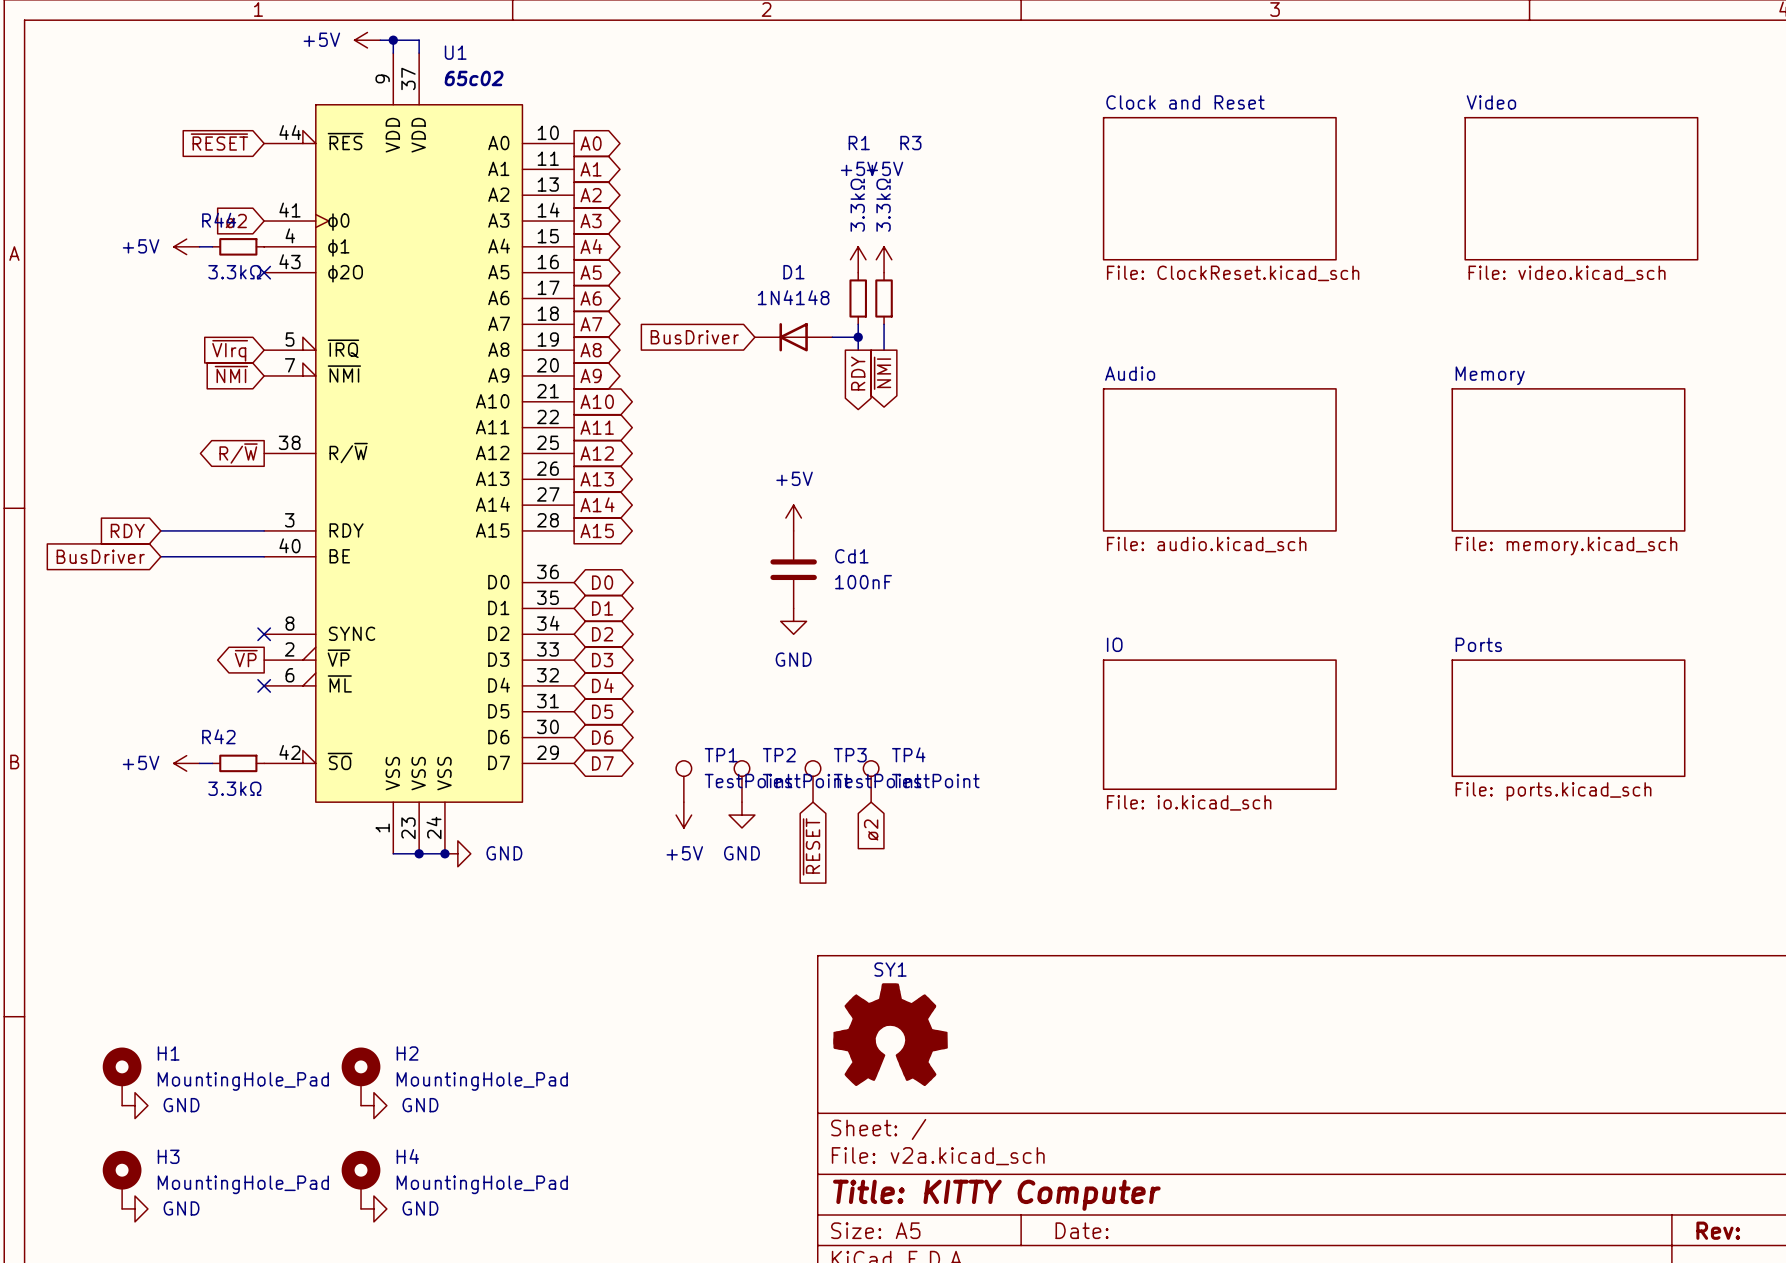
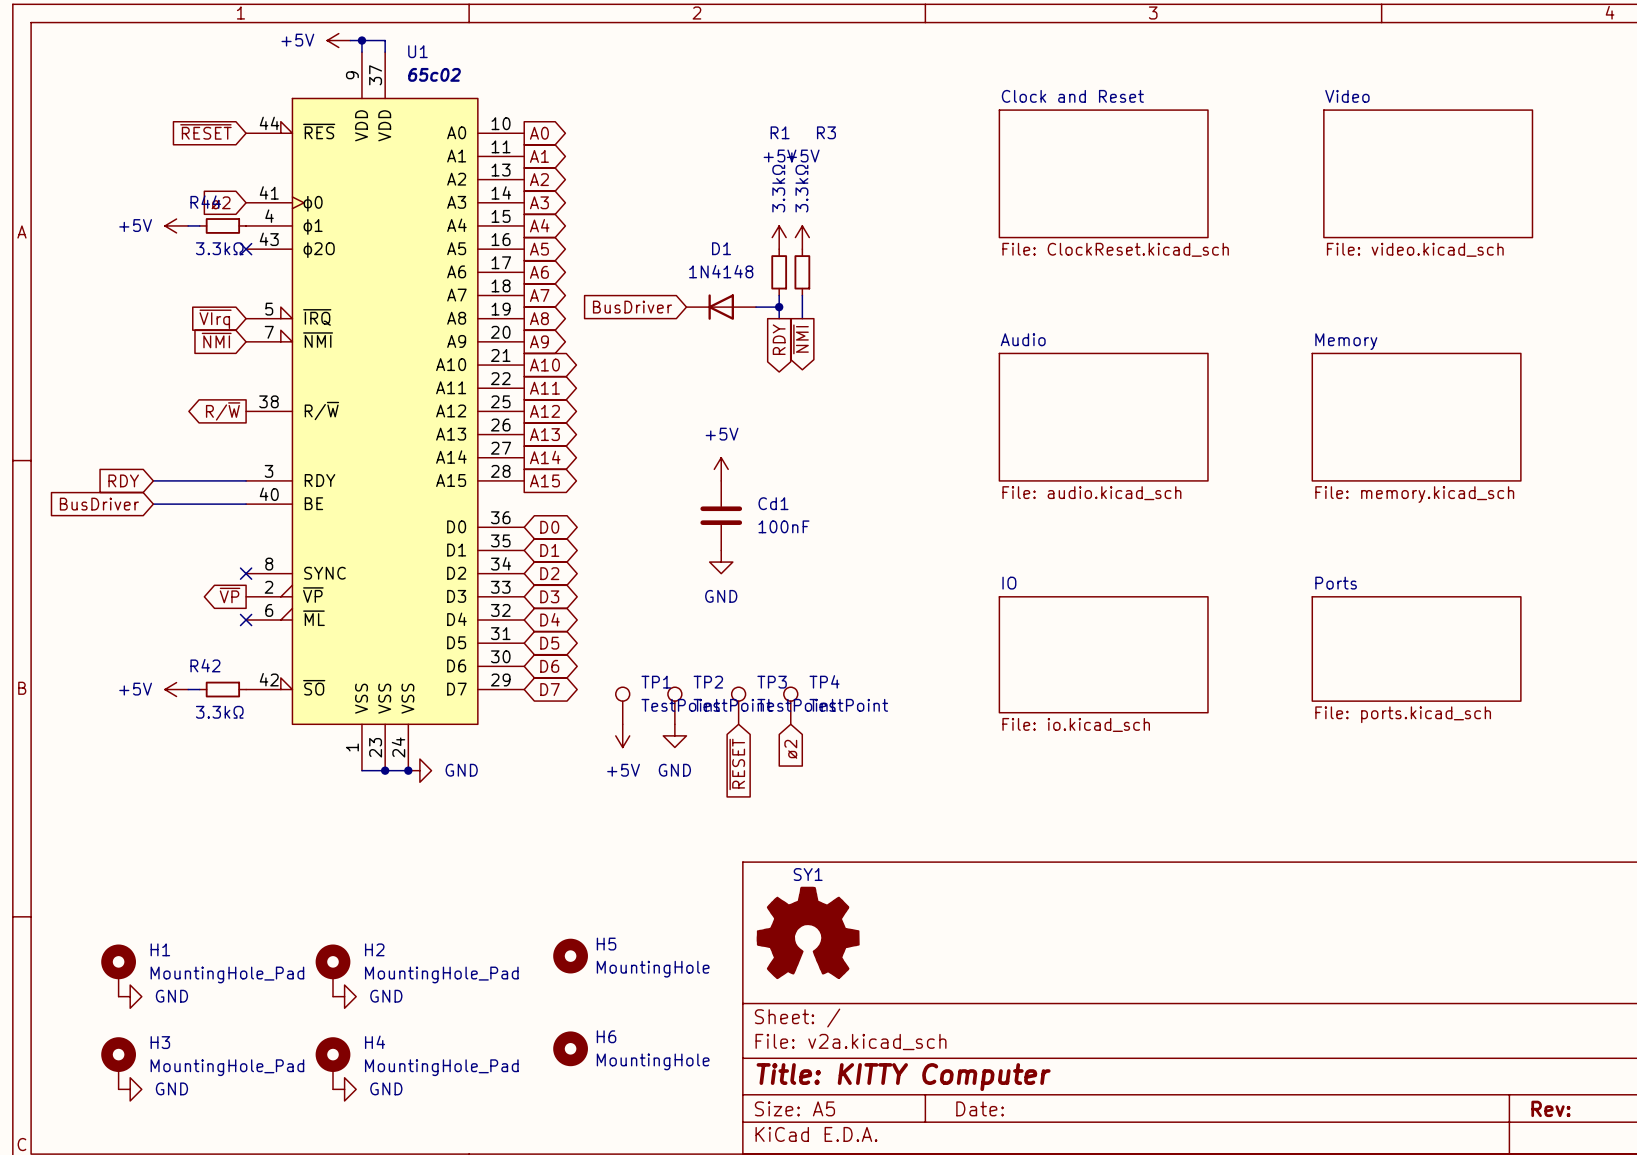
H5: none -> MountingHole (570, 956)
H6: none -> MountingHole (570, 1048)

